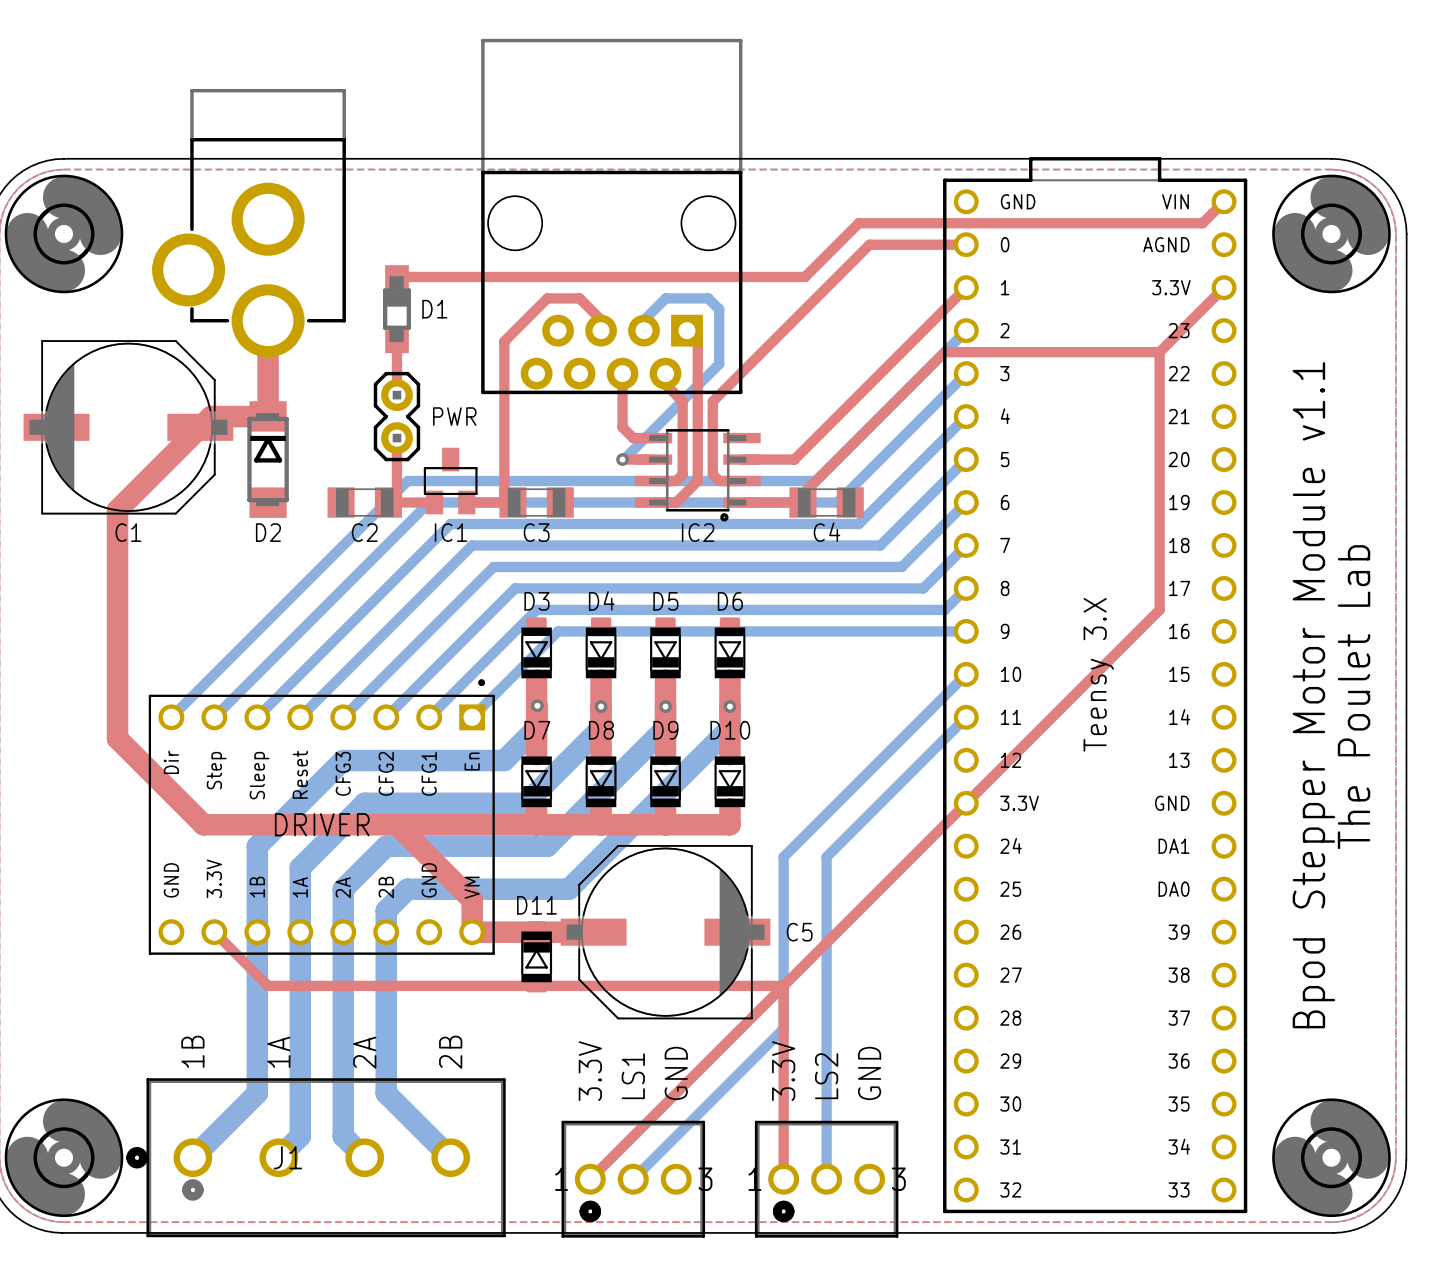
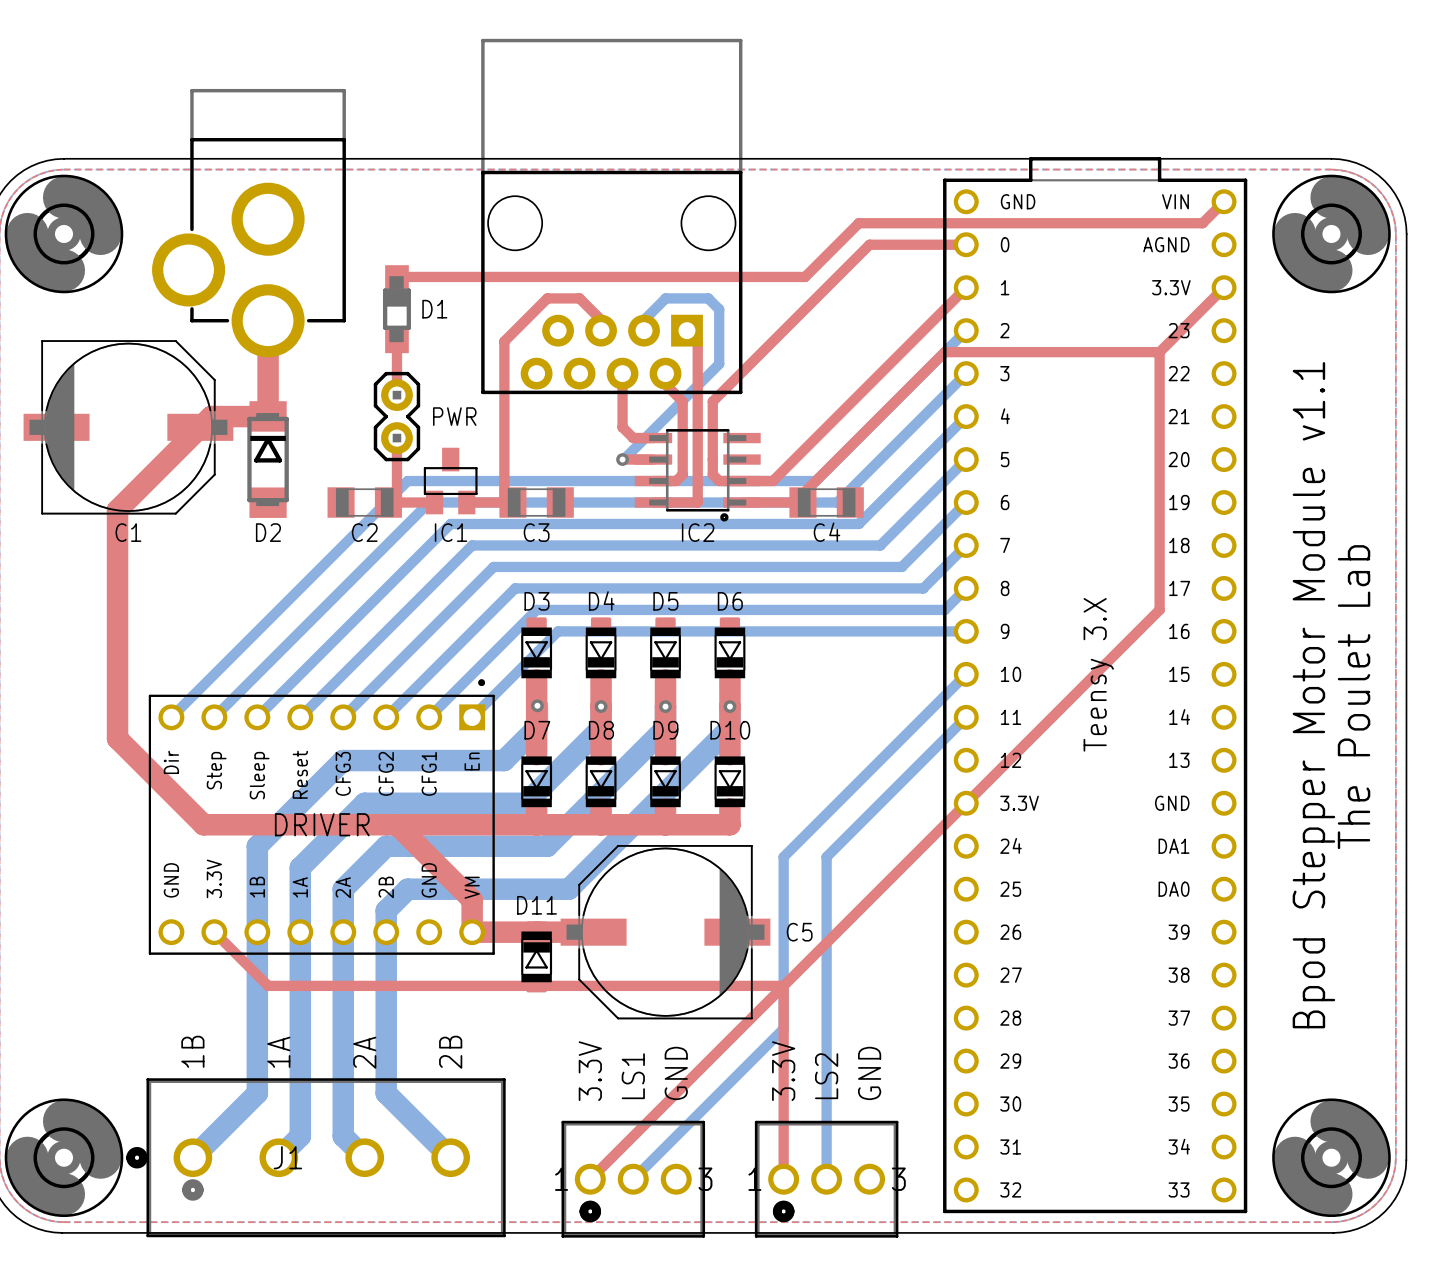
top track: (741, 459) (794, 459) -> (741, 481) (772, 481) (794, 459)
top track: (697, 481) (676, 502) -> (697, 481) (697, 502) (676, 502)

